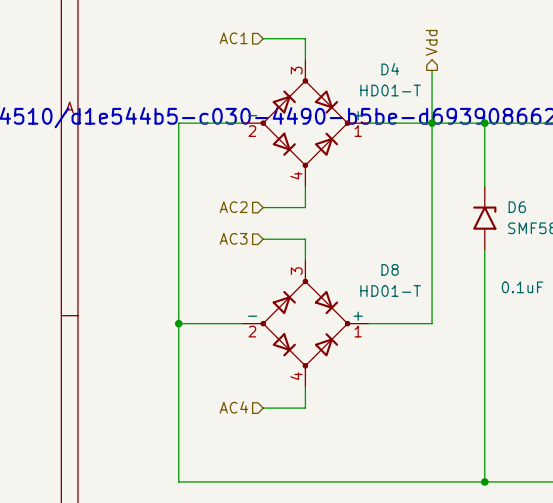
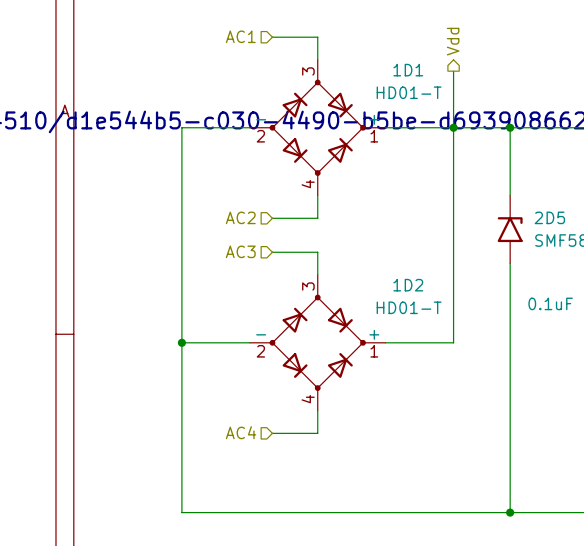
D4 name: D4 (390, 69) -> 1D1 (408, 70)
D6 name: D6 (517, 207) -> 2D5 (549, 217)
D8 name: D8 (390, 269) -> 1D2 (408, 285)

